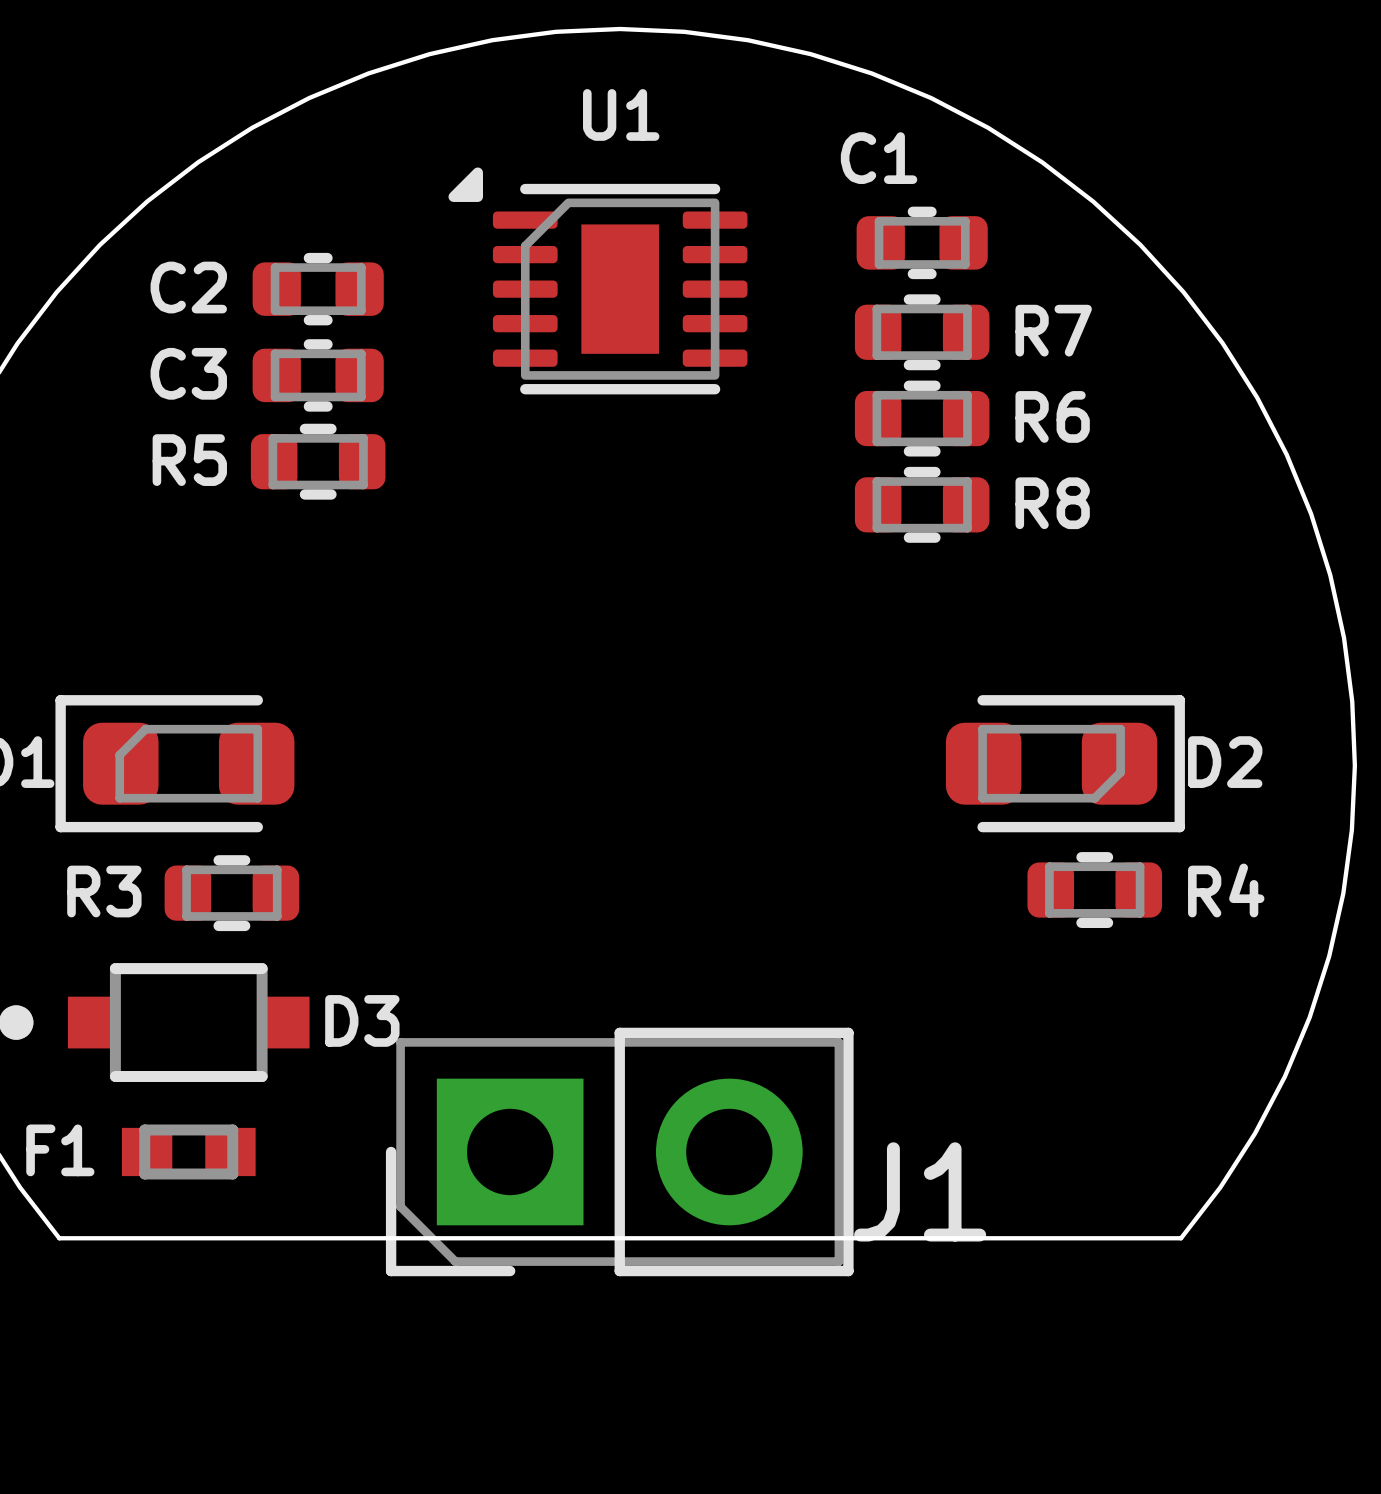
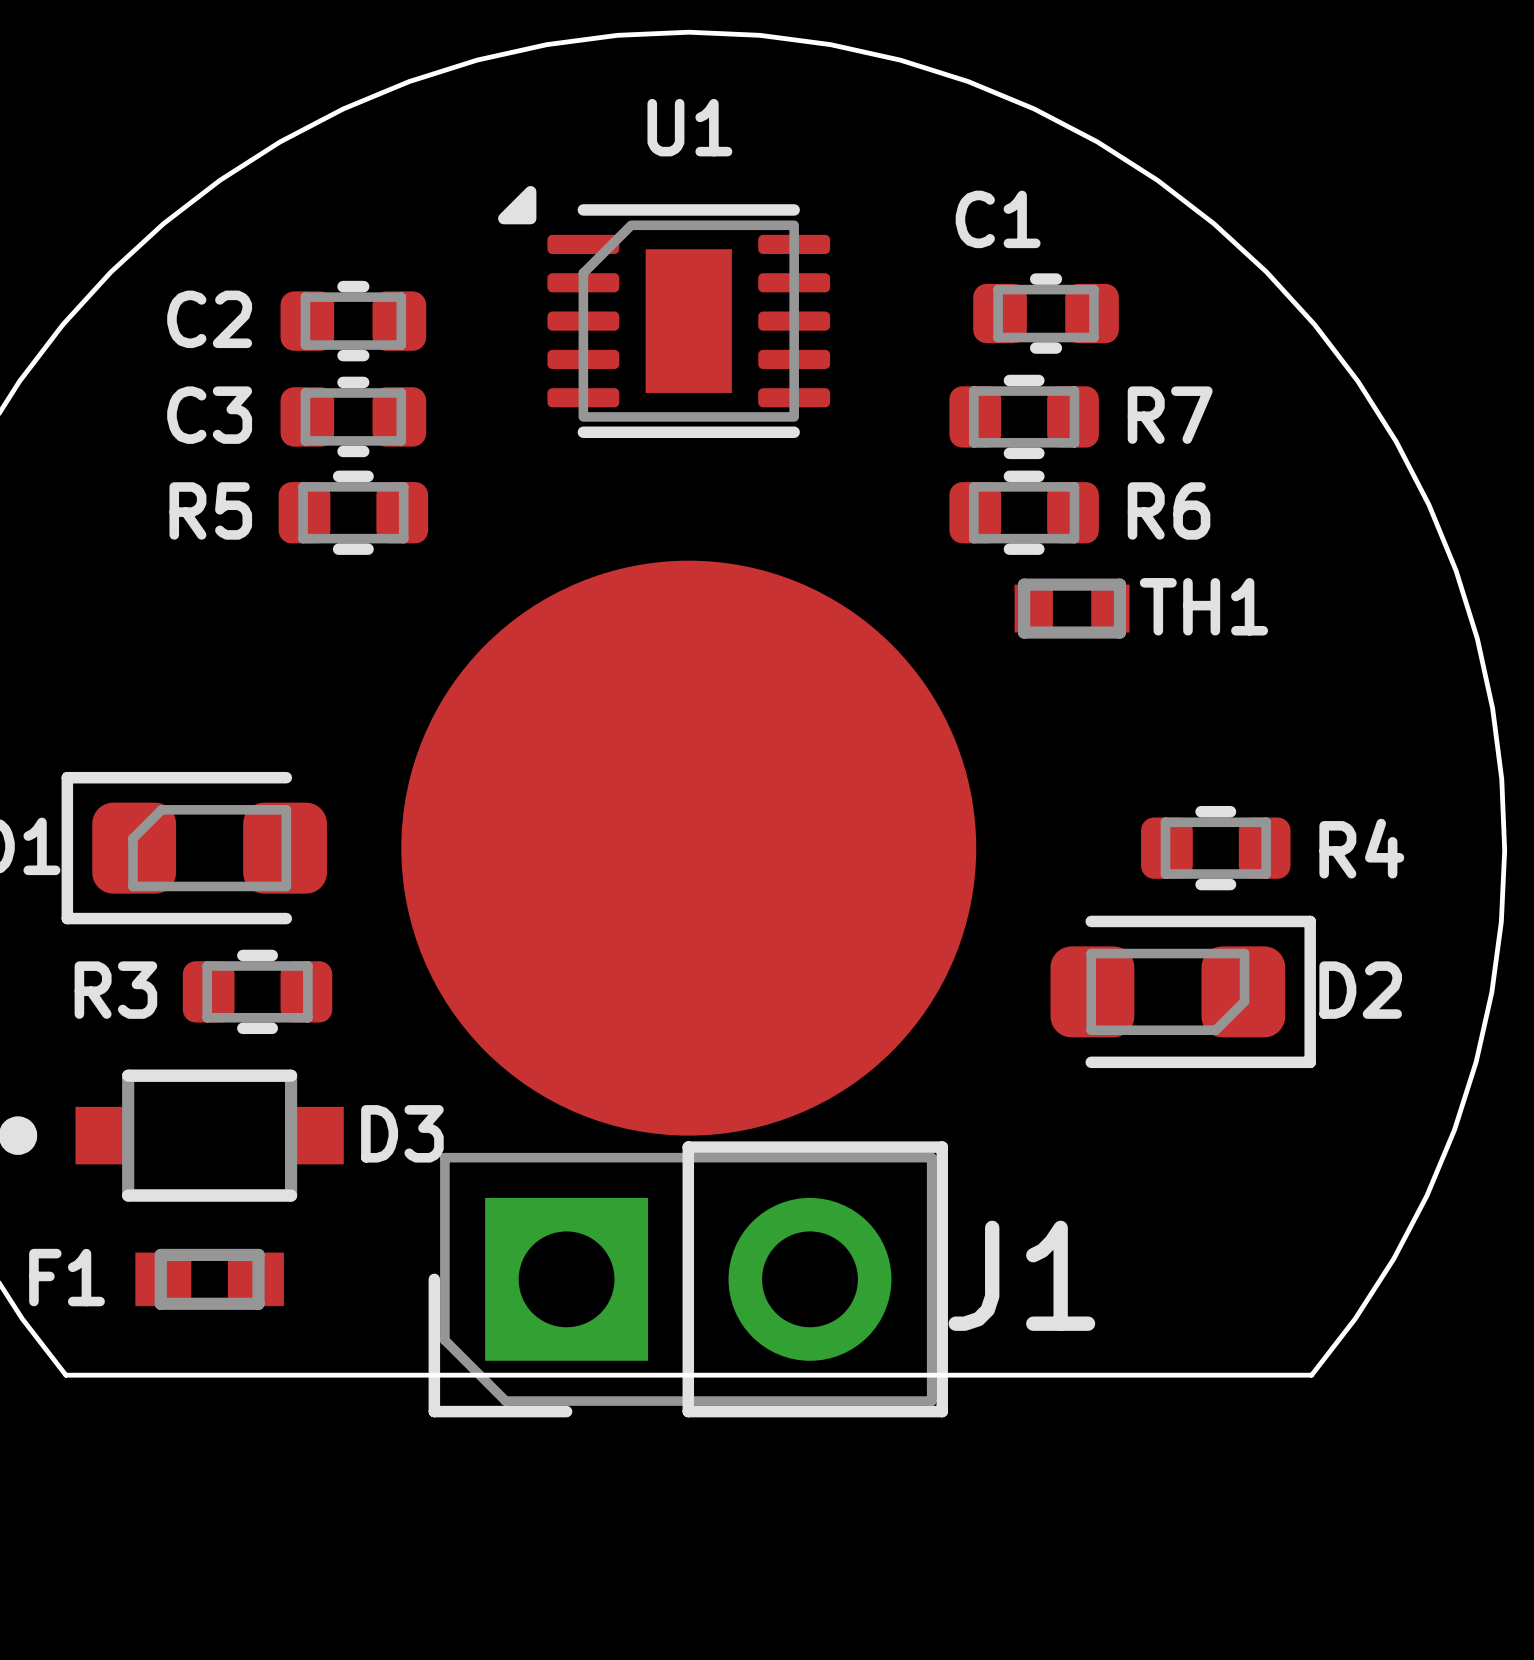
C1 position: (922, 242) -> (1046, 313)
R7 position: (922, 332) -> (1024, 416)
R6 position: (922, 418) -> (1024, 512)
R8: (922, 504) -> none
TH1: none -> (1072, 608)
part: none -> (688, 848)
D2 position: (1065, 763) -> (1183, 991)
R4 position: (1094, 890) -> (1215, 848)
J1 name position: J1 (920, 1191) -> J1 (1021, 1275)

